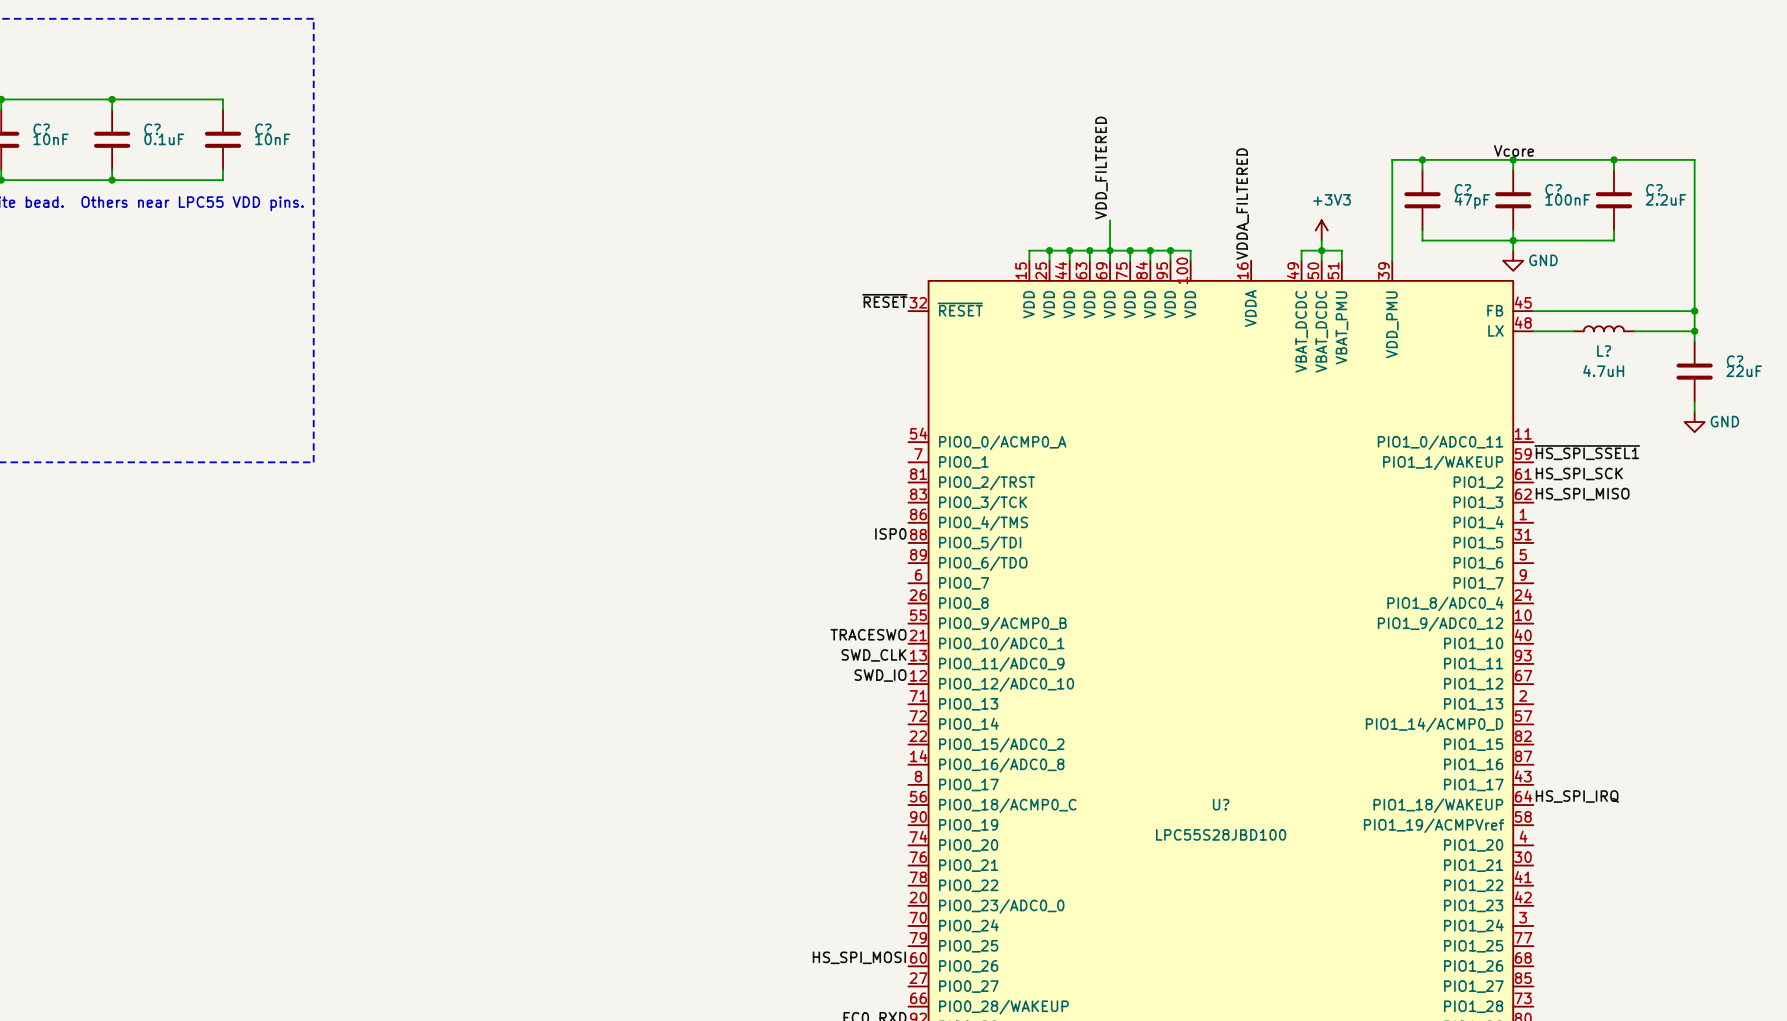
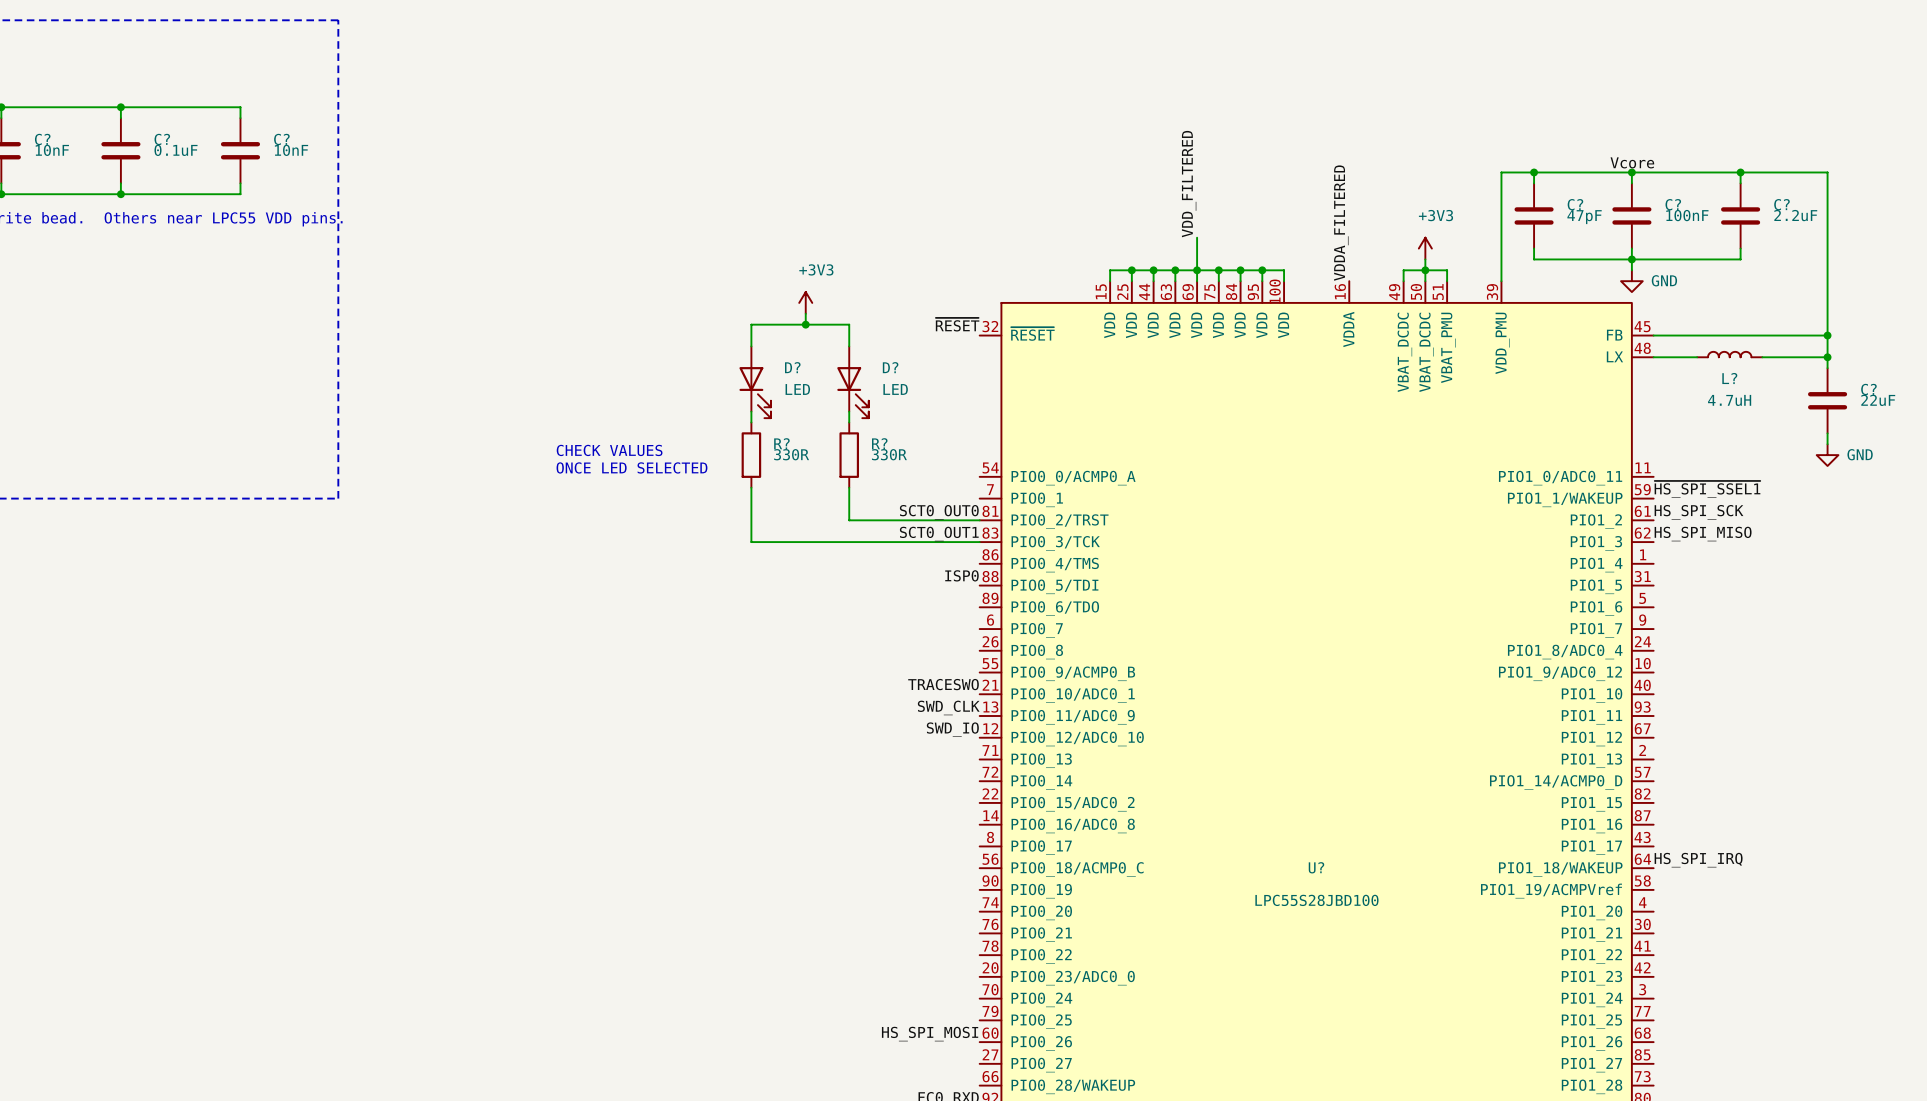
power symbol: none -> +3V3 (805, 302)
wire: none -> (805, 313) (805, 324)
junction: none -> (805, 324)
wire: none -> (751, 346) (751, 324) (849, 324) (849, 346)
D?: none -> LED (755, 382)
D?: none -> LED (853, 382)
wire: none -> (751, 411) (751, 422)
wire: none -> (849, 411) (849, 422)
text: none -> CHECK VALUES (609, 450)
R?: none -> 330R (751, 455)
R?: none -> 330R (849, 455)
text: none -> ONCE LED SELECTED (631, 467)
wire: none -> (751, 487) (751, 542) (979, 542)
wire: none -> (849, 487) (849, 520) (979, 520)
label: none -> SCT0_OUT0 (939, 512)
label: none -> SCT0_OUT1 (939, 534)

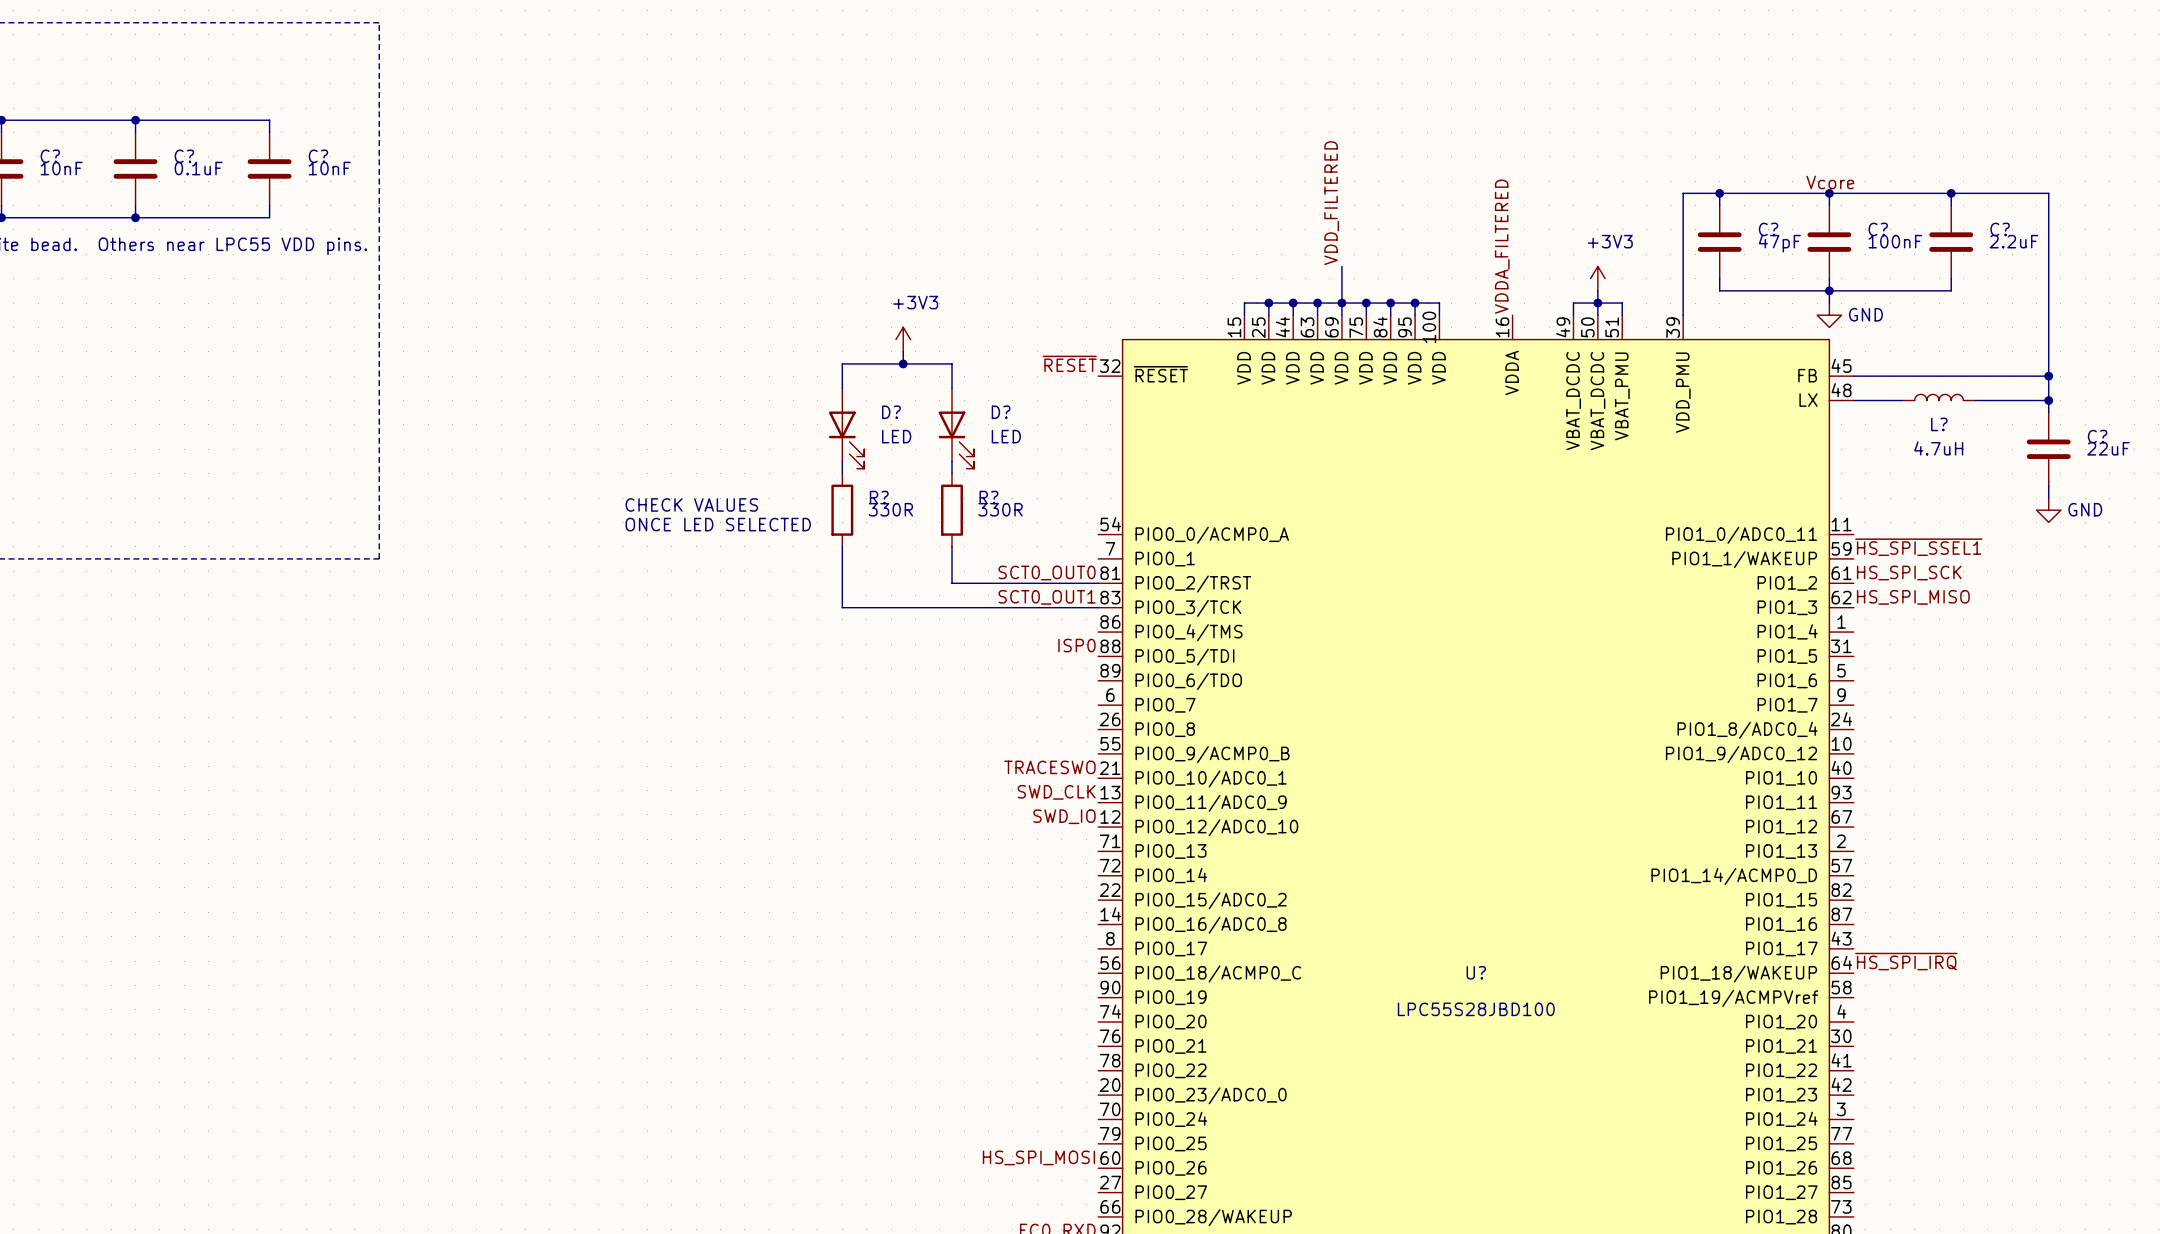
label: HS_SPI_IRQ (1698, 860) -> ~{HS_SPI_IRQ} (1906, 961)

